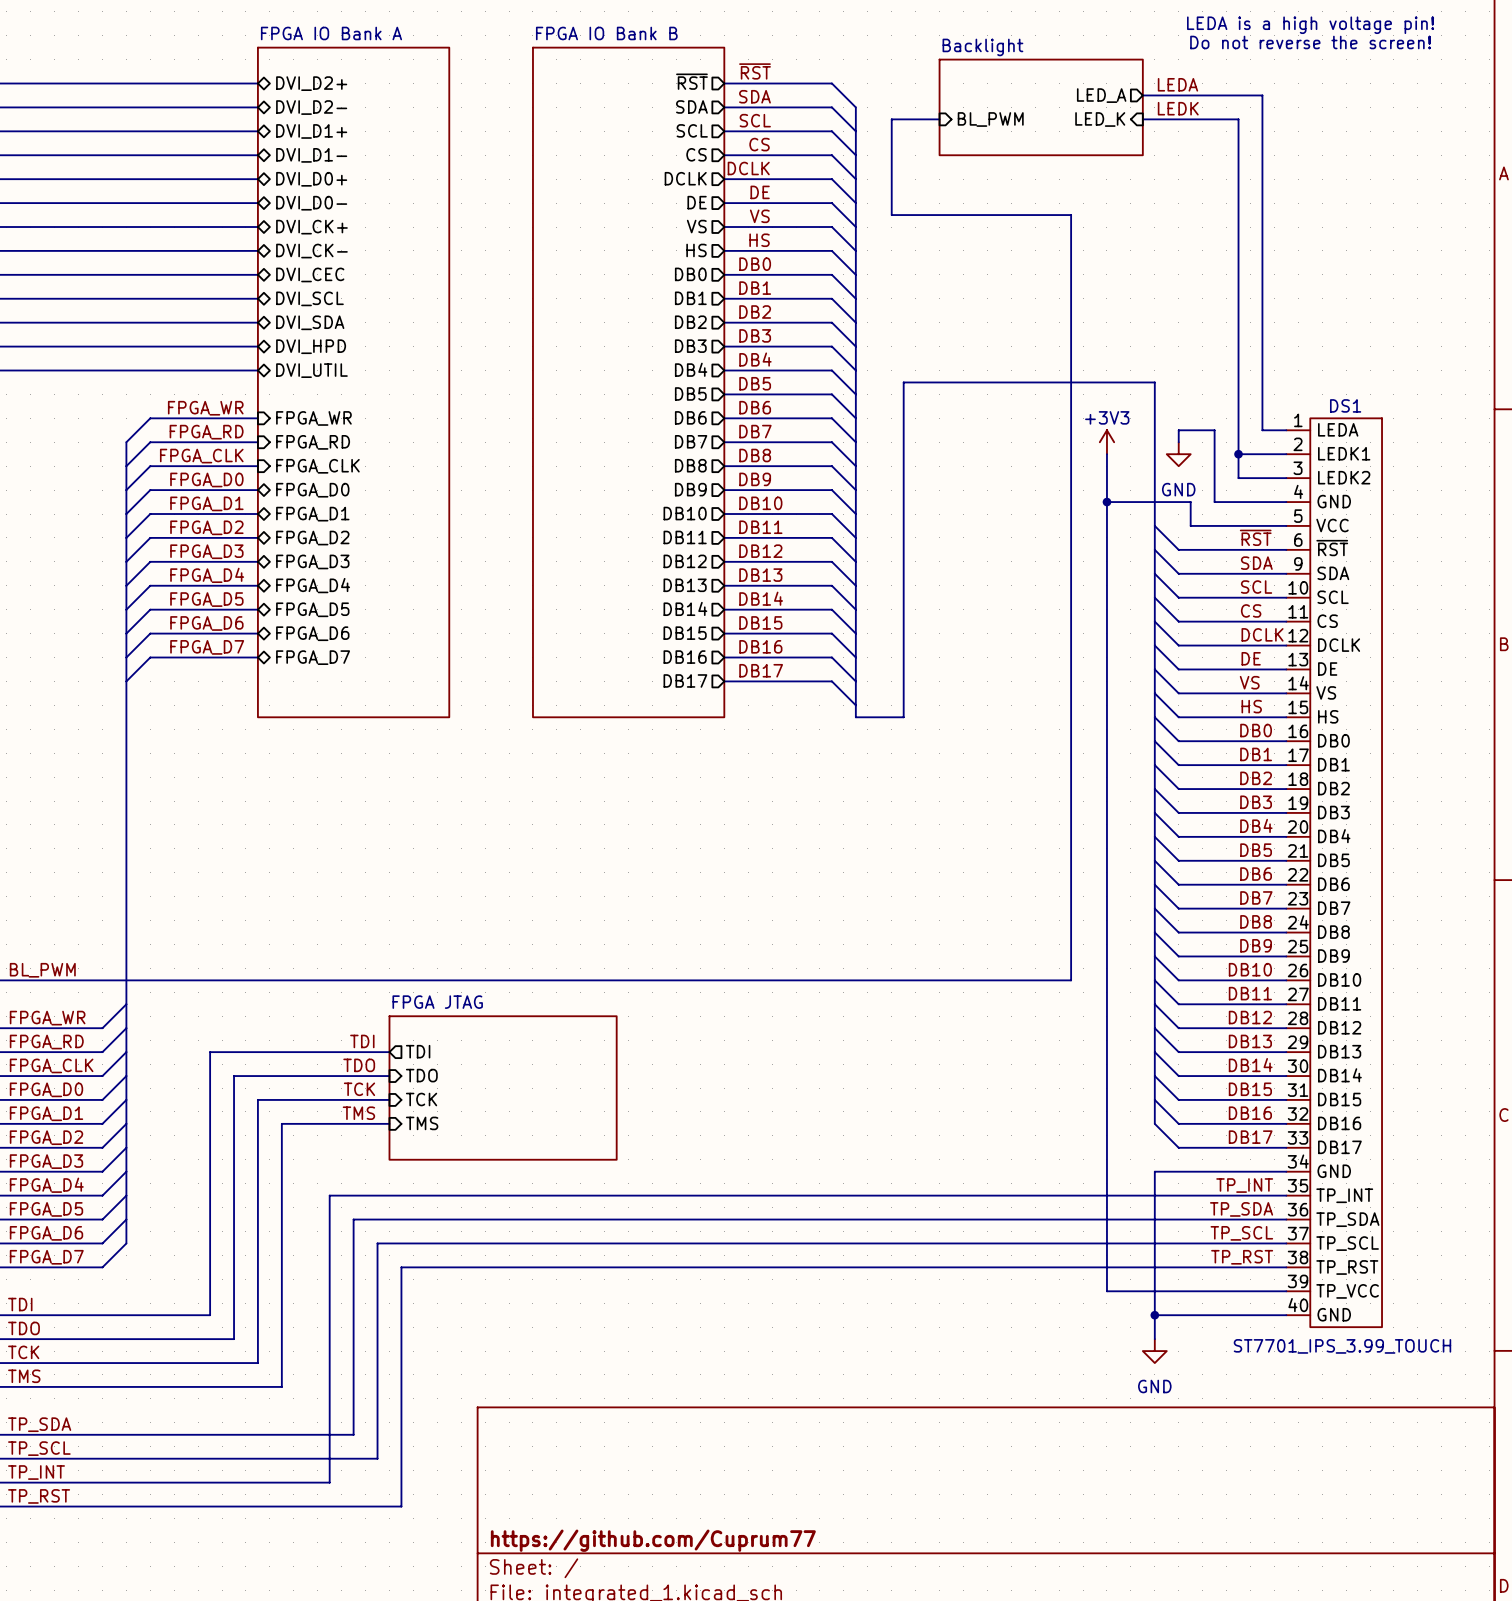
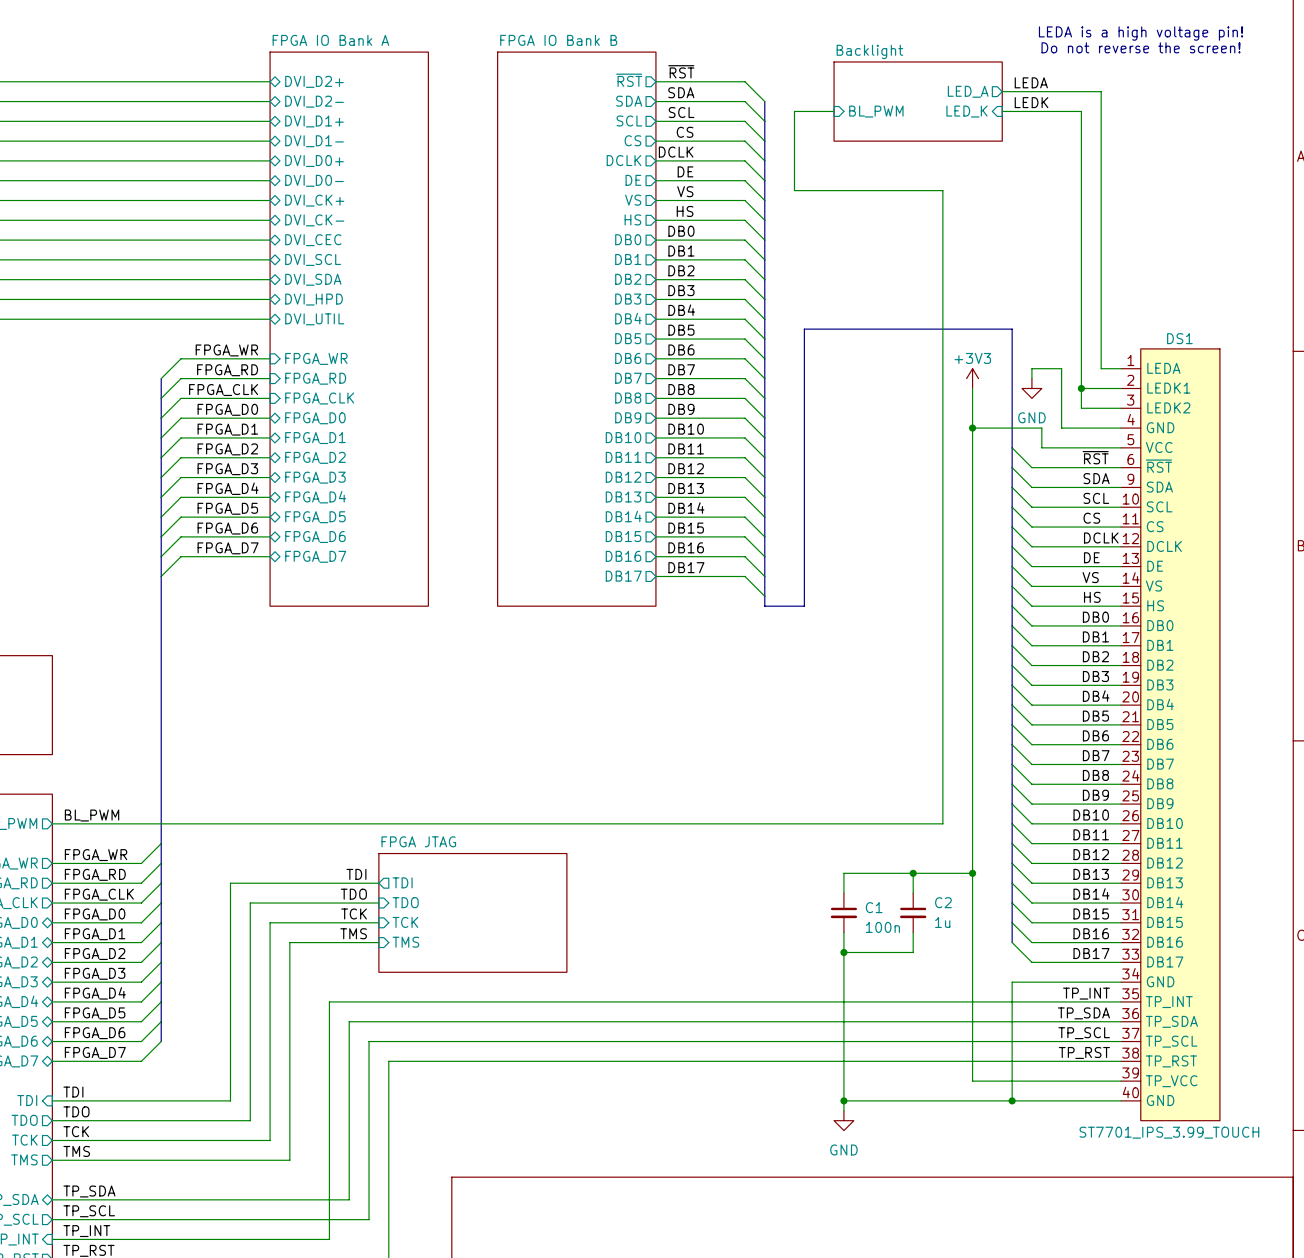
DS1 symbol: [1286, 418, 1383, 1328] -> [1120, 348, 1220, 1121]
wire: none -> (913, 873) (913, 893)
junction: none -> (913, 873)
wire: none -> (972, 873) (843, 873) (843, 893)
junction: none -> (972, 873)
C1: none -> 100n (843, 912)
C2: none -> 1u (913, 912)
wire: none -> (843, 932) (843, 1110)
wire: none -> (913, 932) (913, 952) (843, 952)
junction: none -> (843, 952)
junction: none -> (843, 1100)
wire: (1154, 1315) (1154, 1339) -> (1012, 1100) (843, 1100)
power symbol position: GND (1154, 1351) -> GND (843, 1120)

